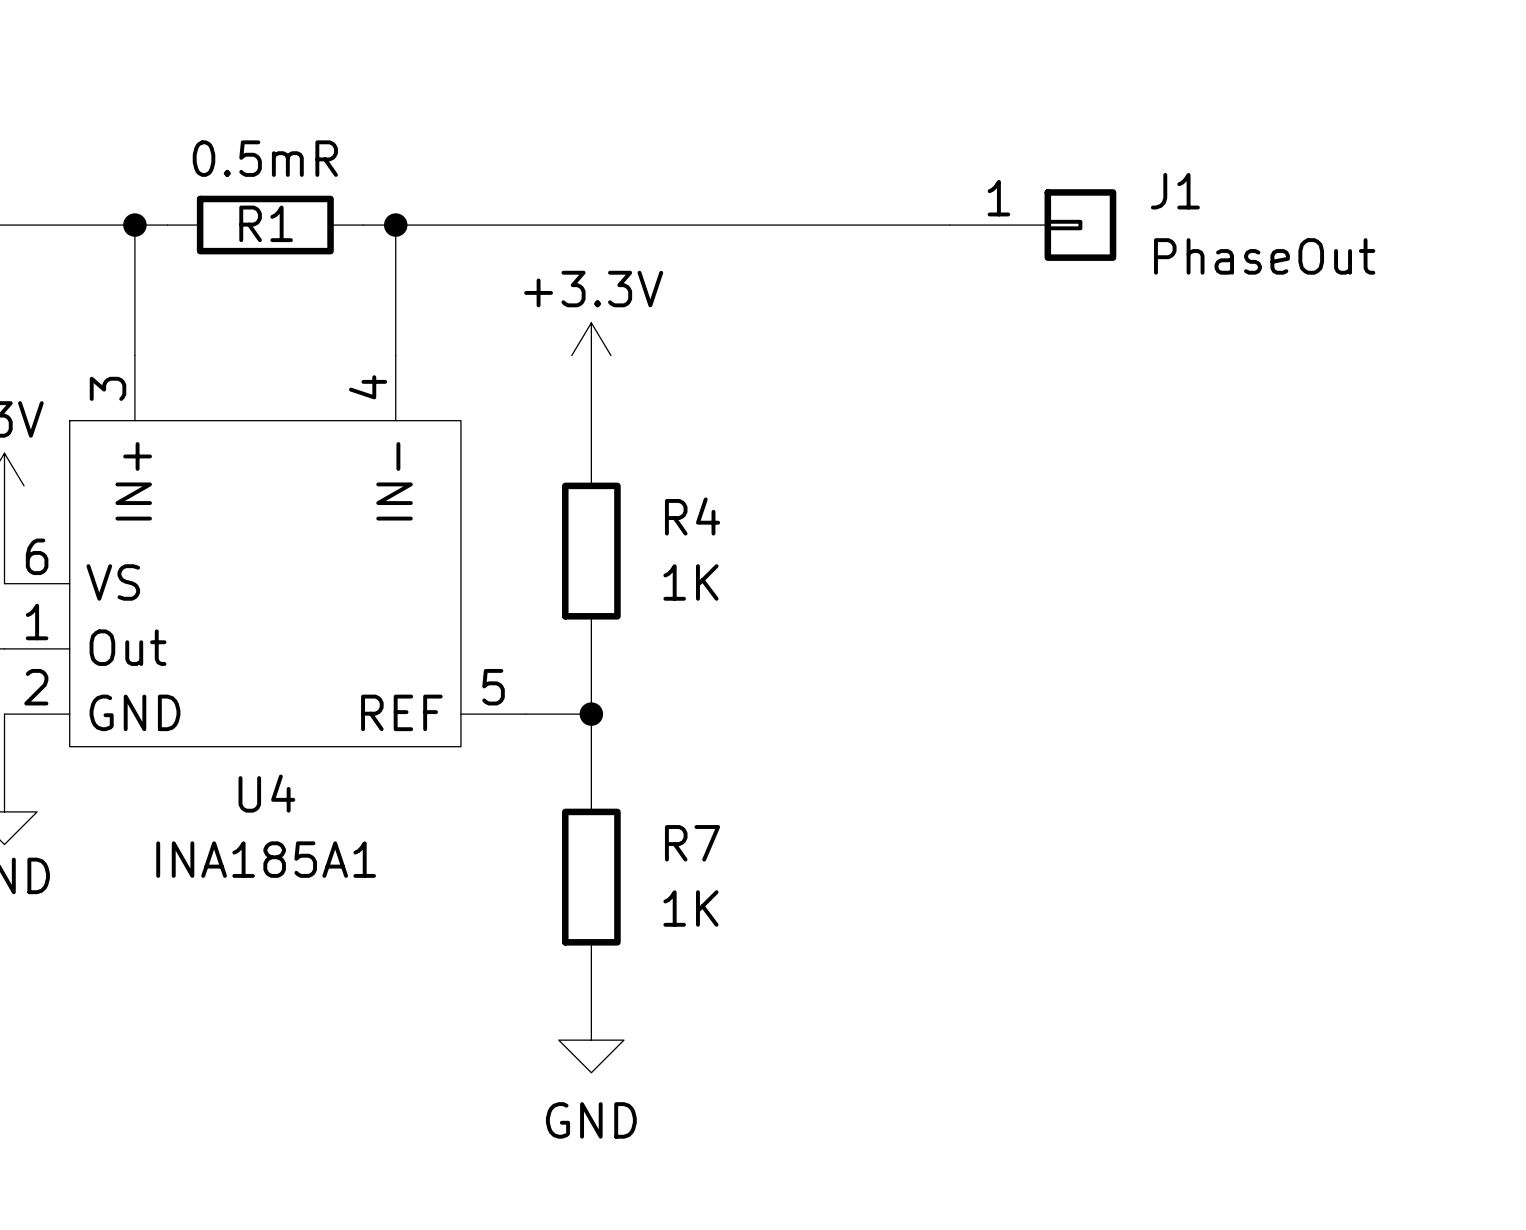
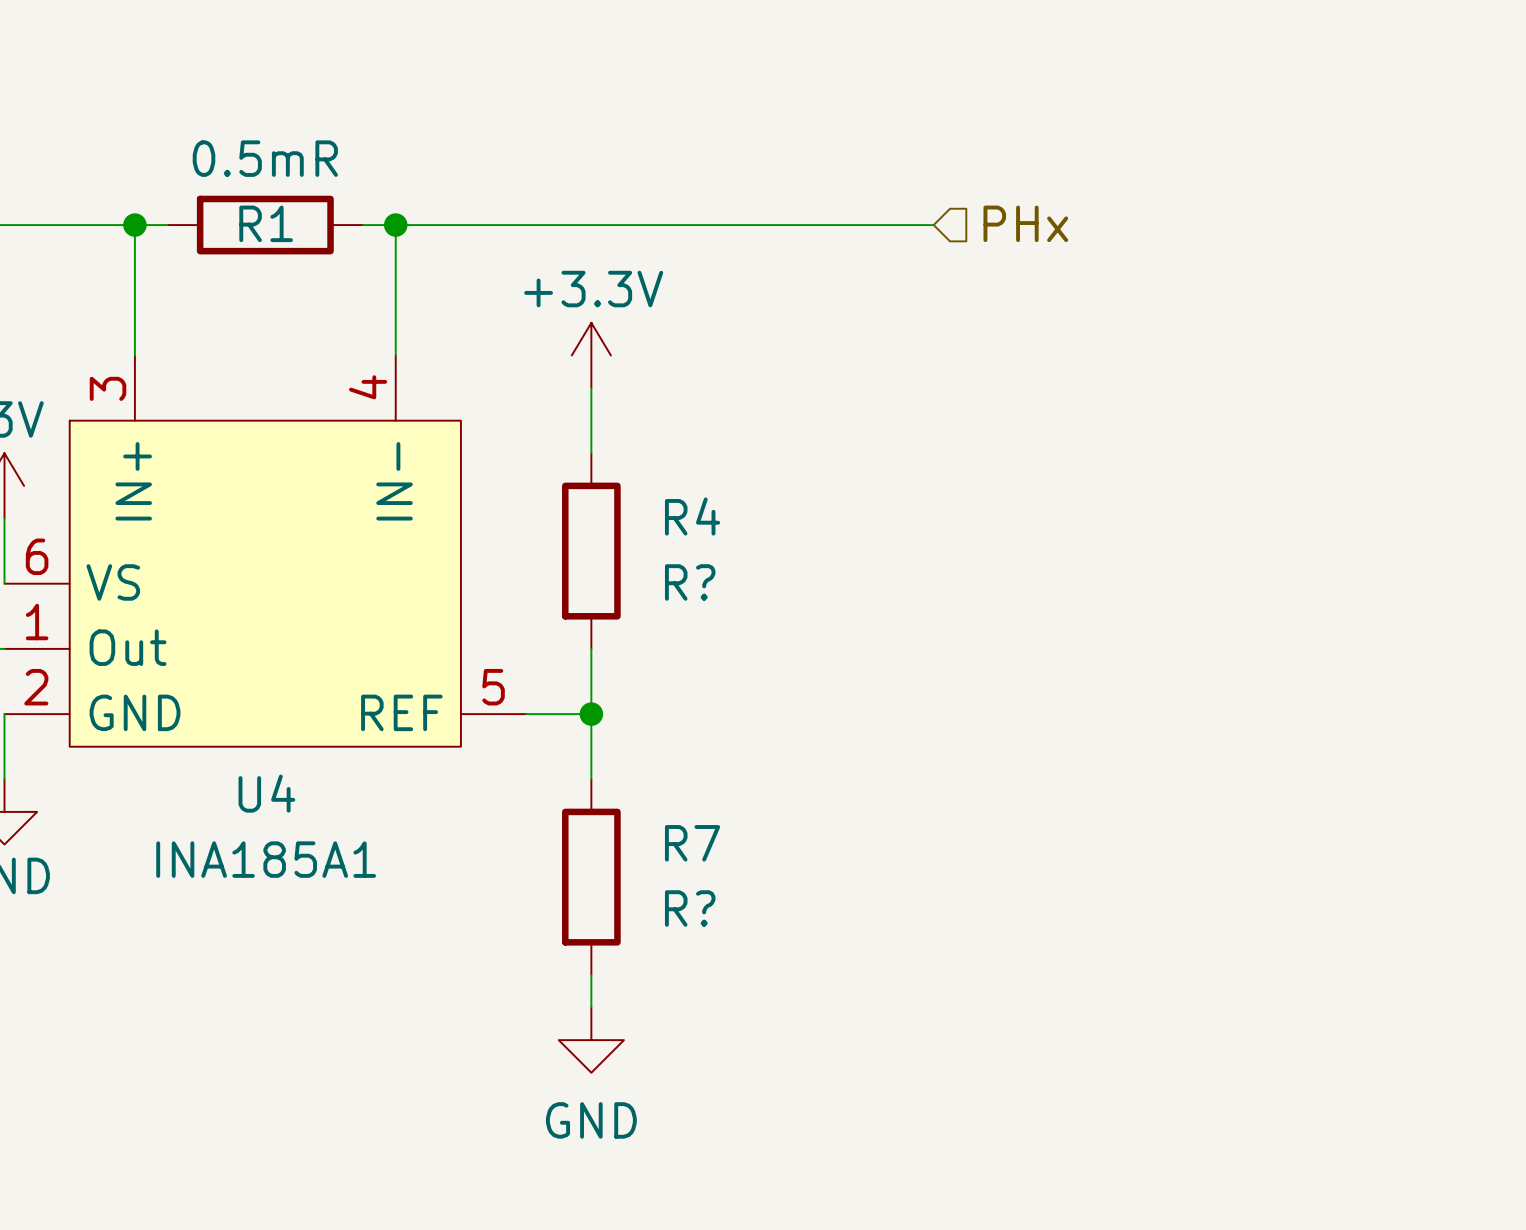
hierarchical label: none -> PHx (1025, 223)
wire: (933, 225) (950, 225) -> none
J1: PhaseOut (1033, 225) -> none
R4 value: 1K (690, 582) -> R? (690, 582)
R7 value: 1K (690, 908) -> R? (690, 908)

